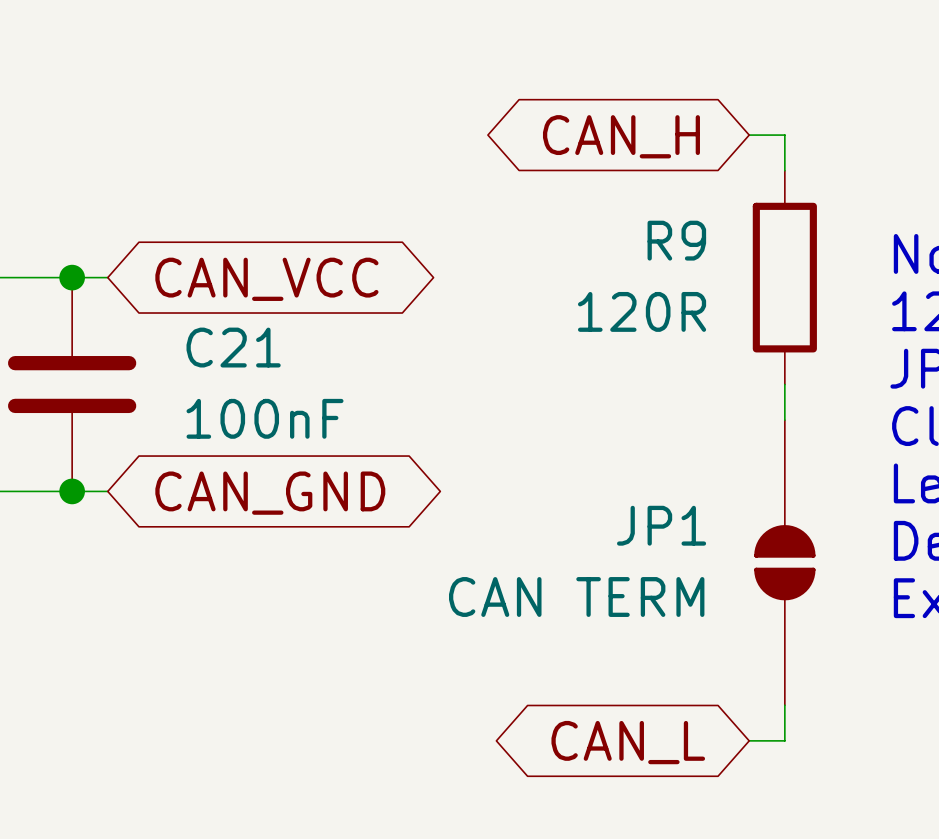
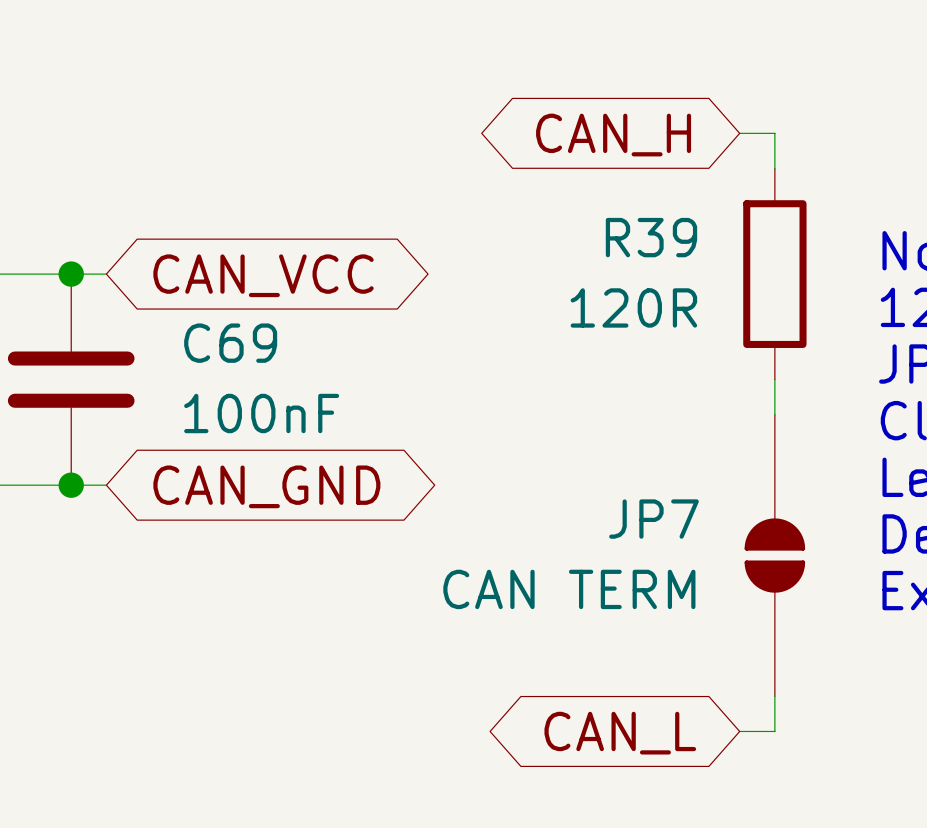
R9 name: R9 (676, 240) -> R39 (651, 237)
C21 name: C21 (233, 347) -> C69 (230, 343)
JP1 name: JP1 (661, 525) -> JP7 (653, 519)

